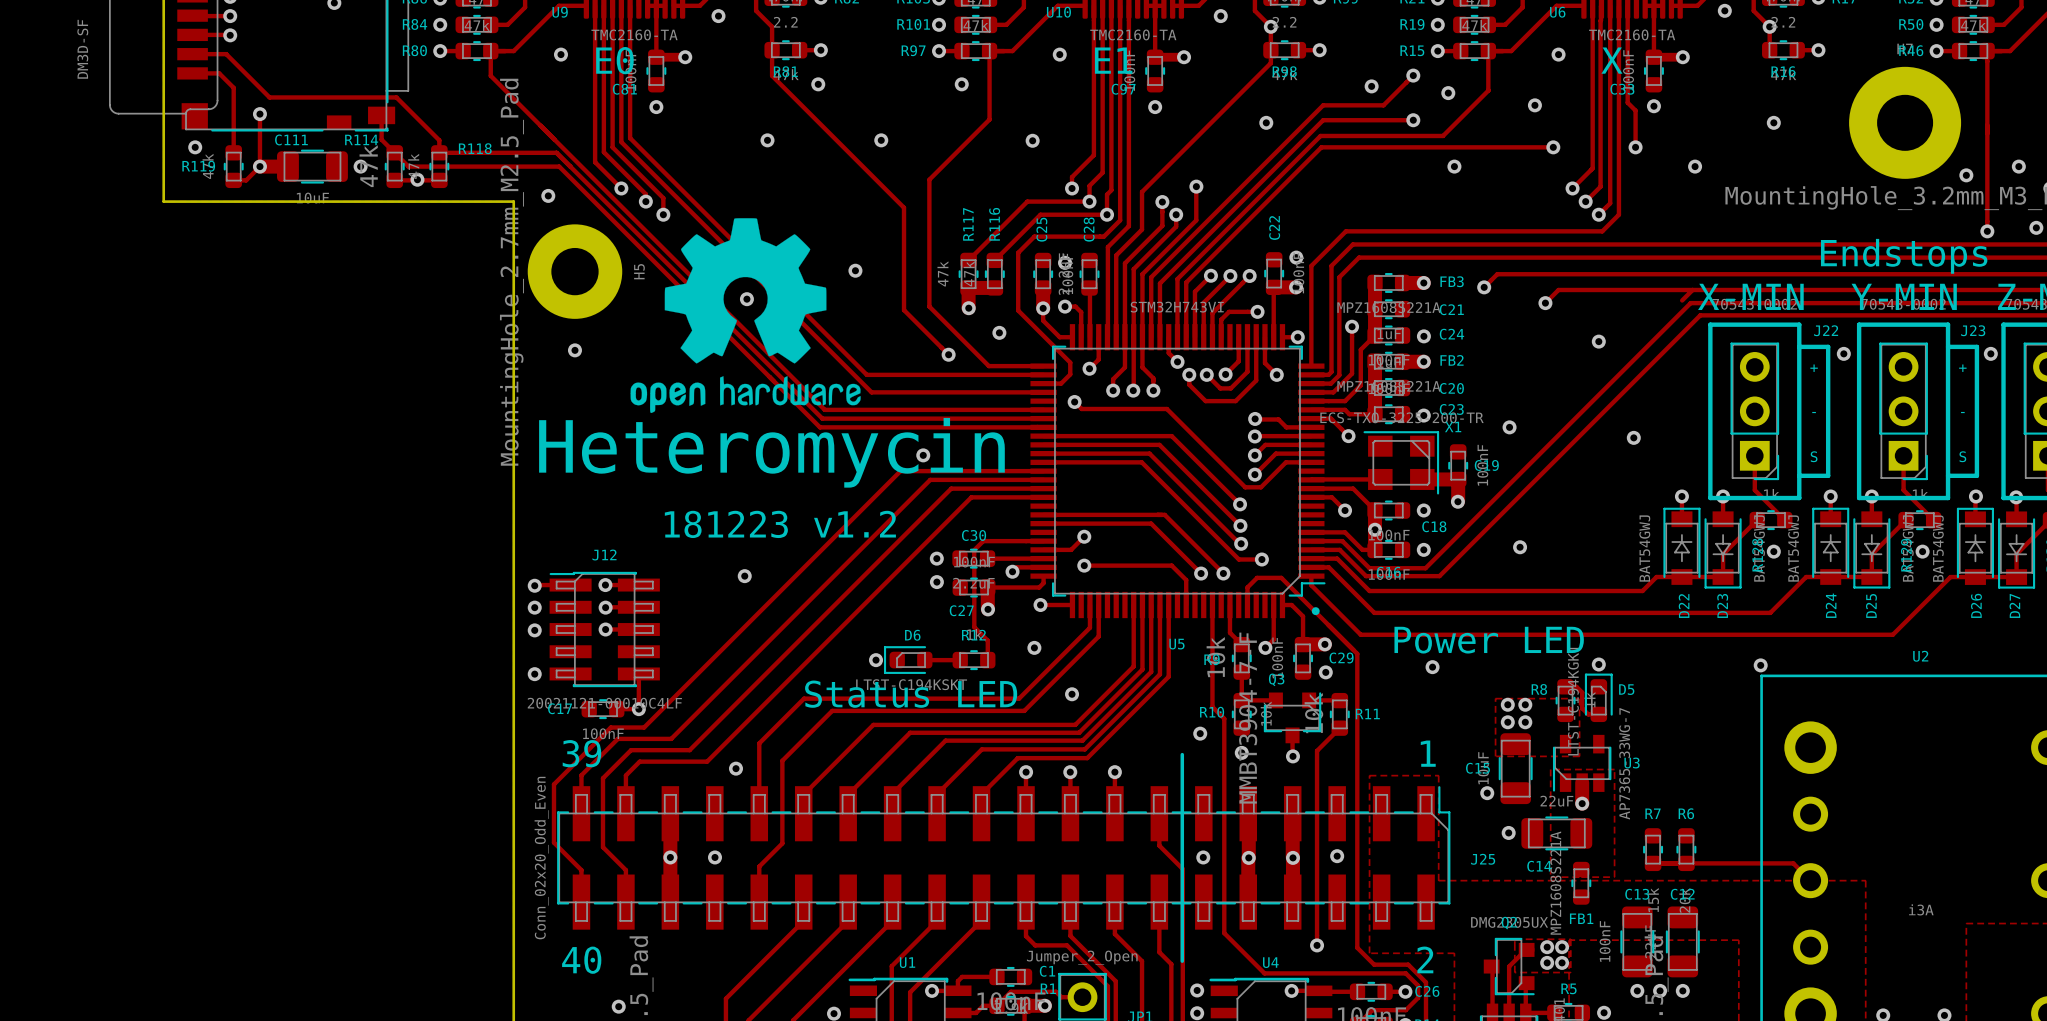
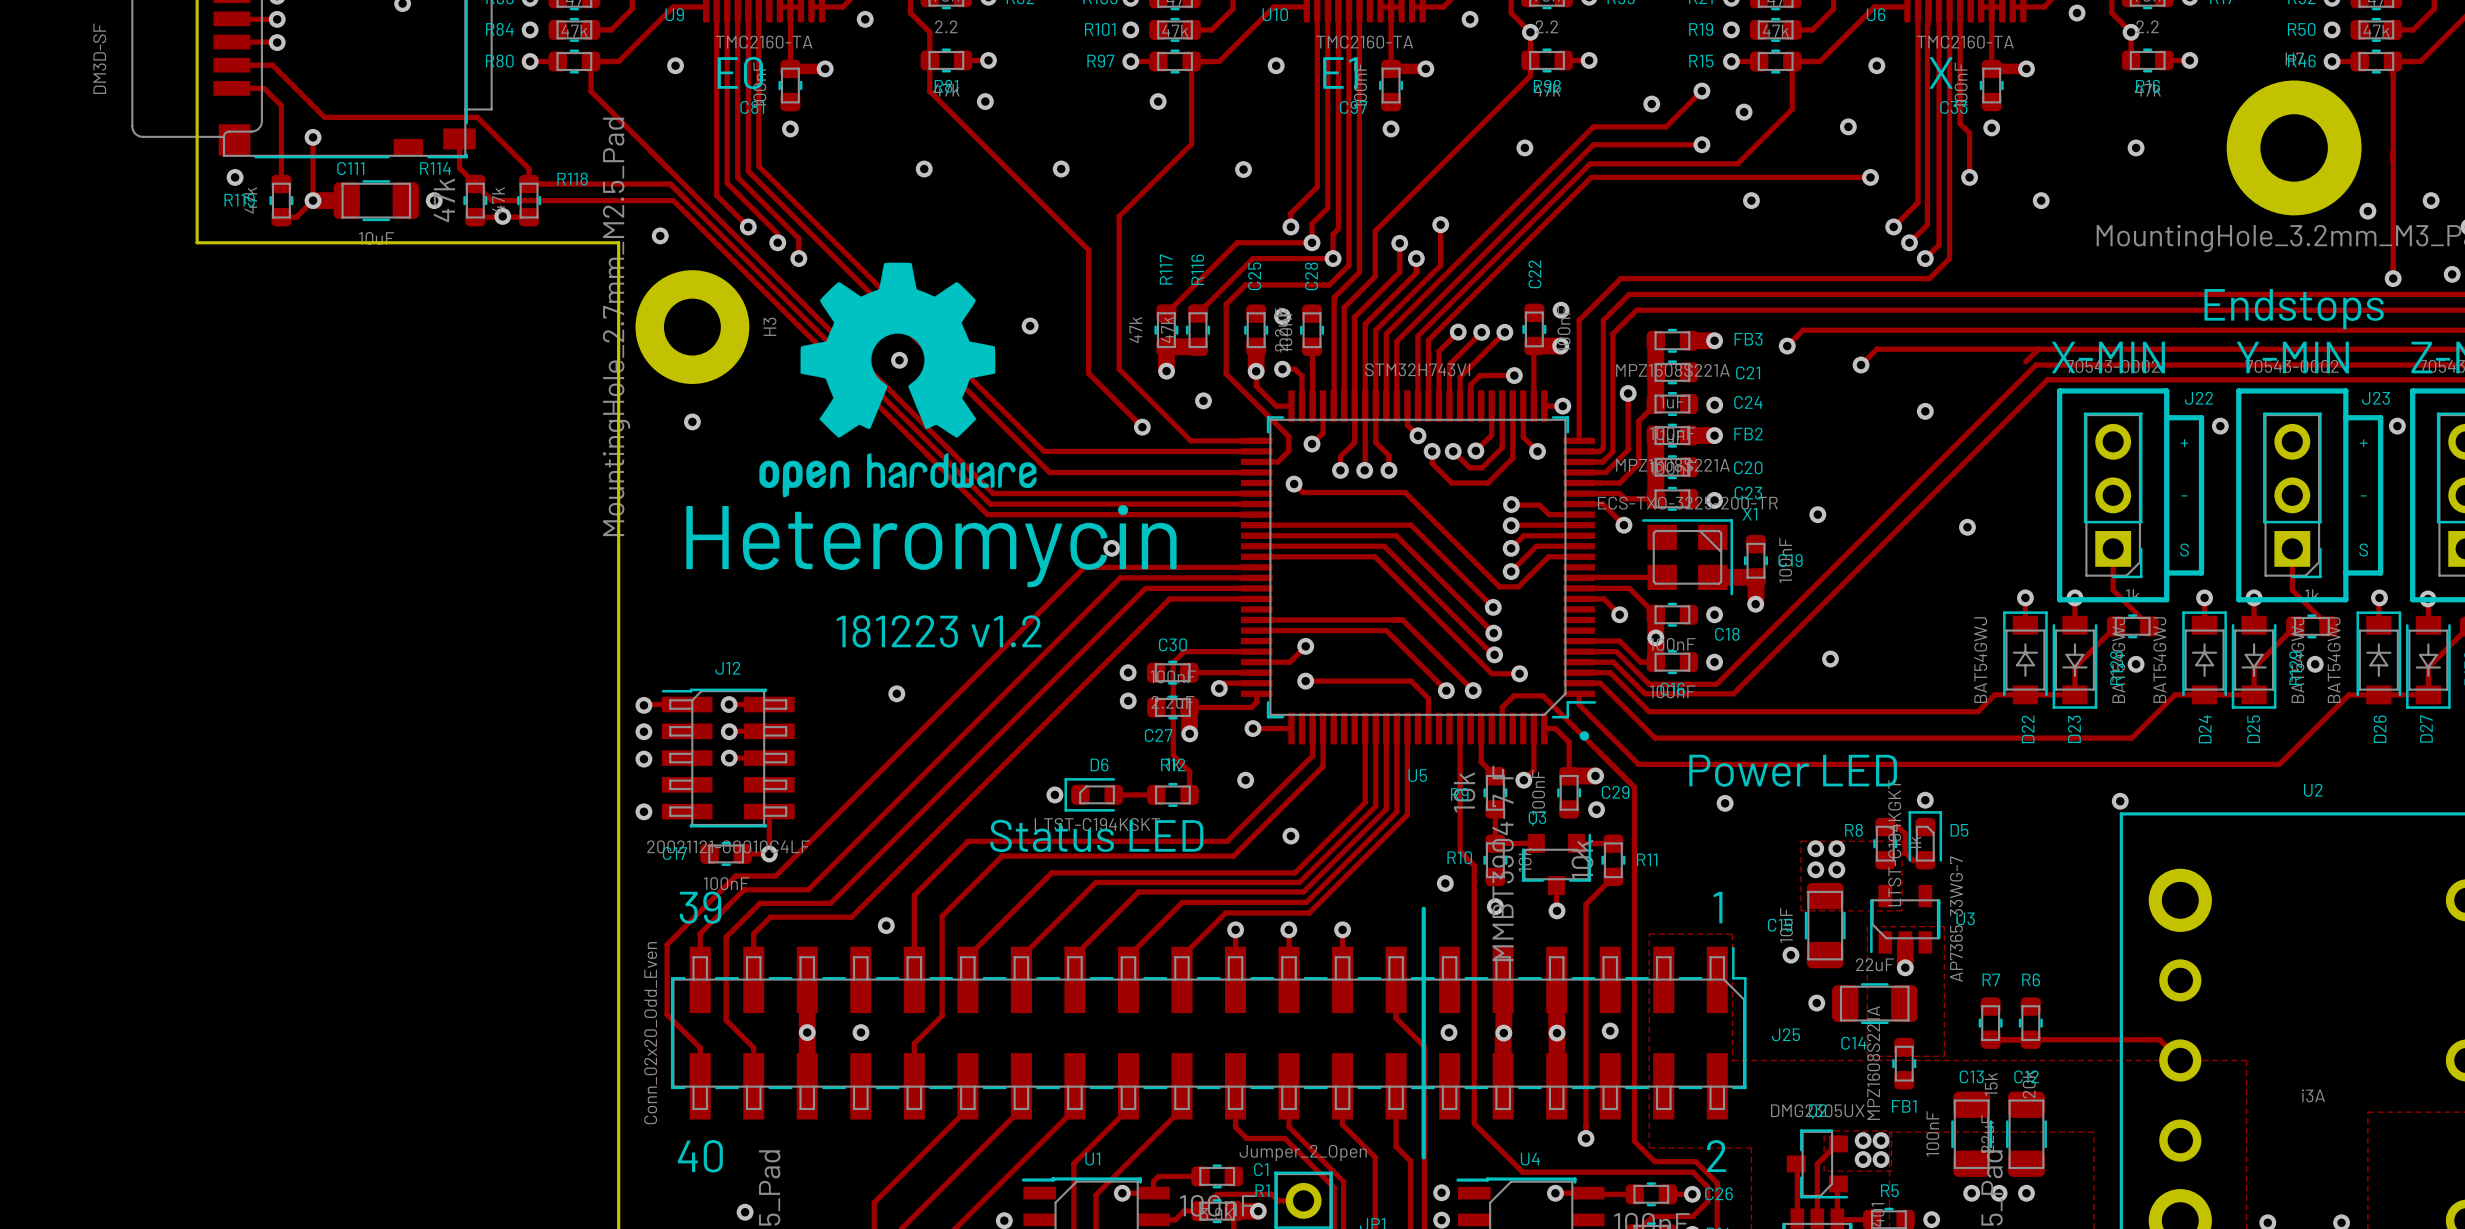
H5 name: H5 (639, 271) -> H3 (769, 326)

